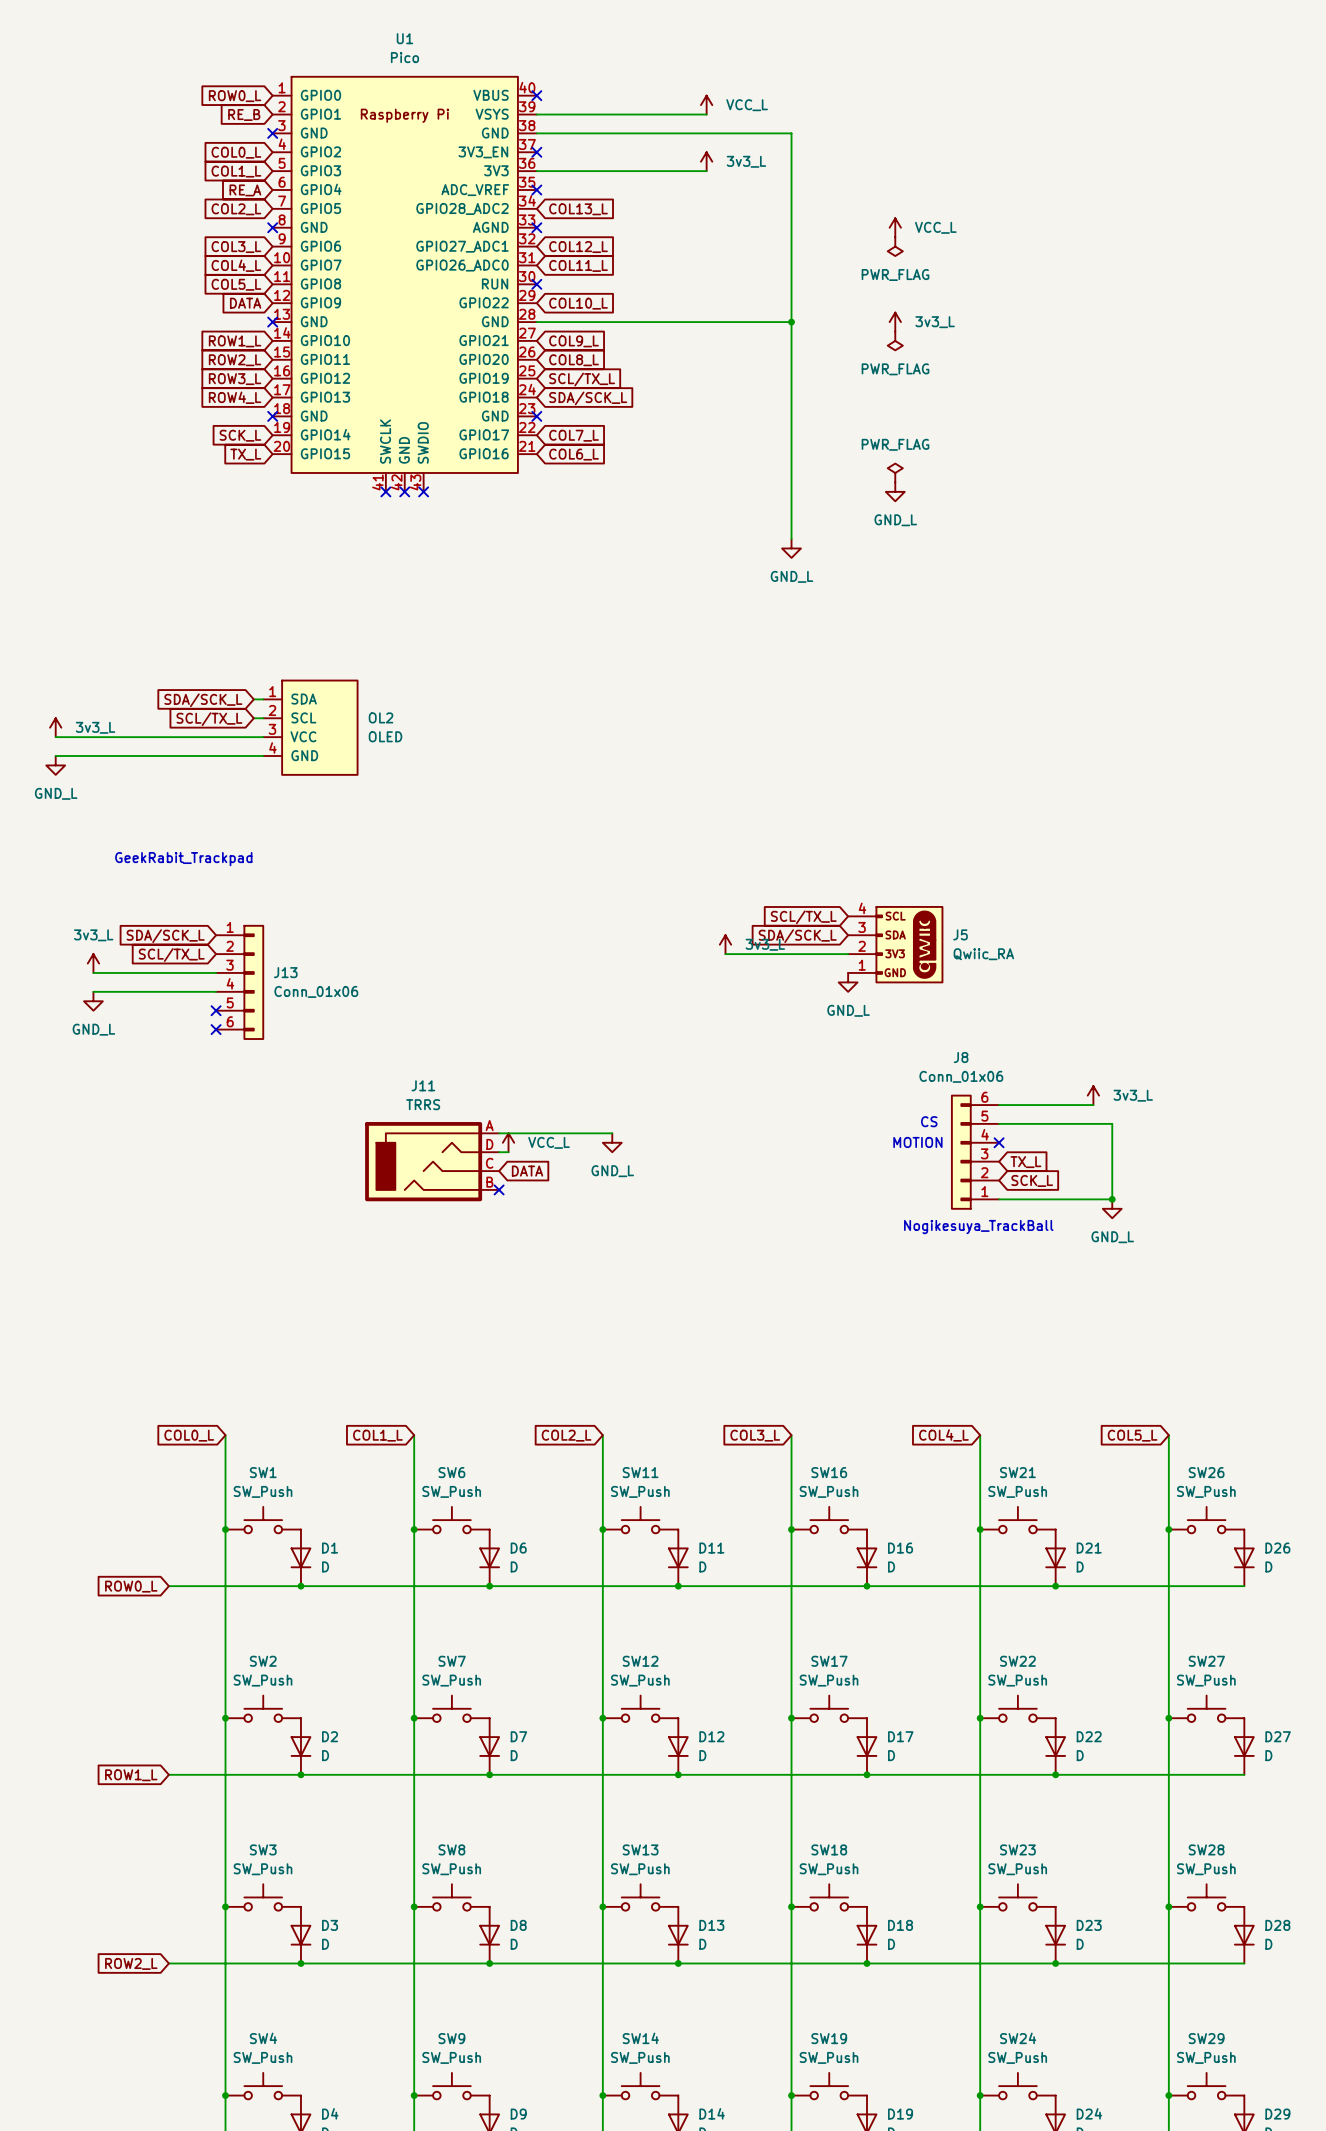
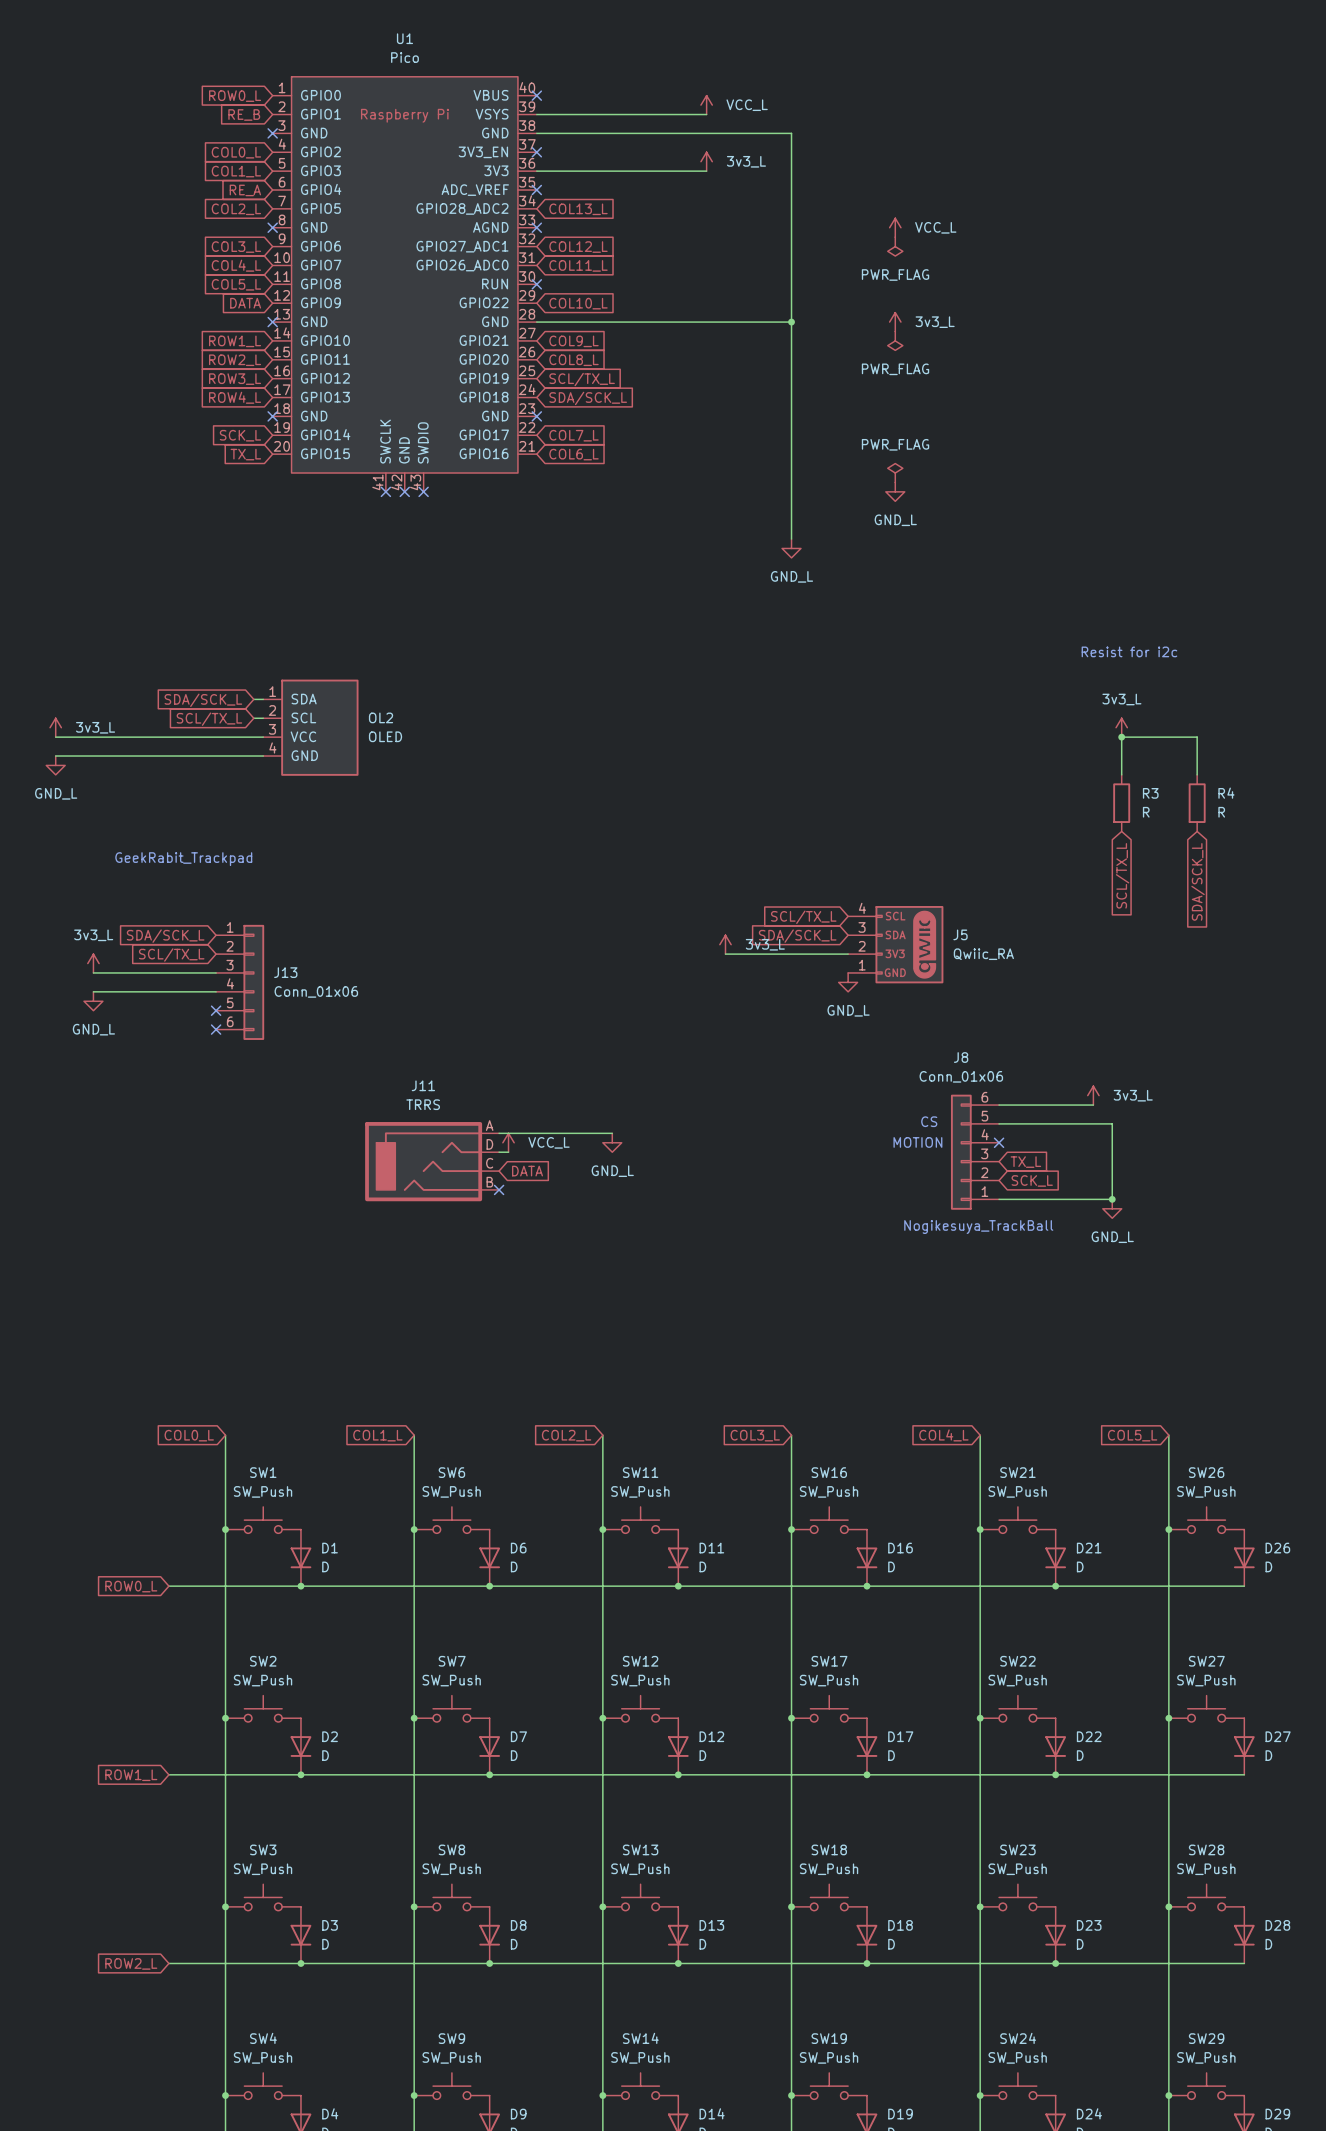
text: none -> Resist for i2c (1129, 651)
power symbol: none -> 3v3_L (1121, 727)
junction: none -> (1121, 737)
wire: none -> (1121, 774) (1121, 737) (1197, 737) (1197, 774)
R3: none -> R (1121, 803)
R4: none -> R (1197, 803)
global label: none -> SCL/TX_L (1122, 875)
global label: none -> SDA/SCK_L (1198, 881)

